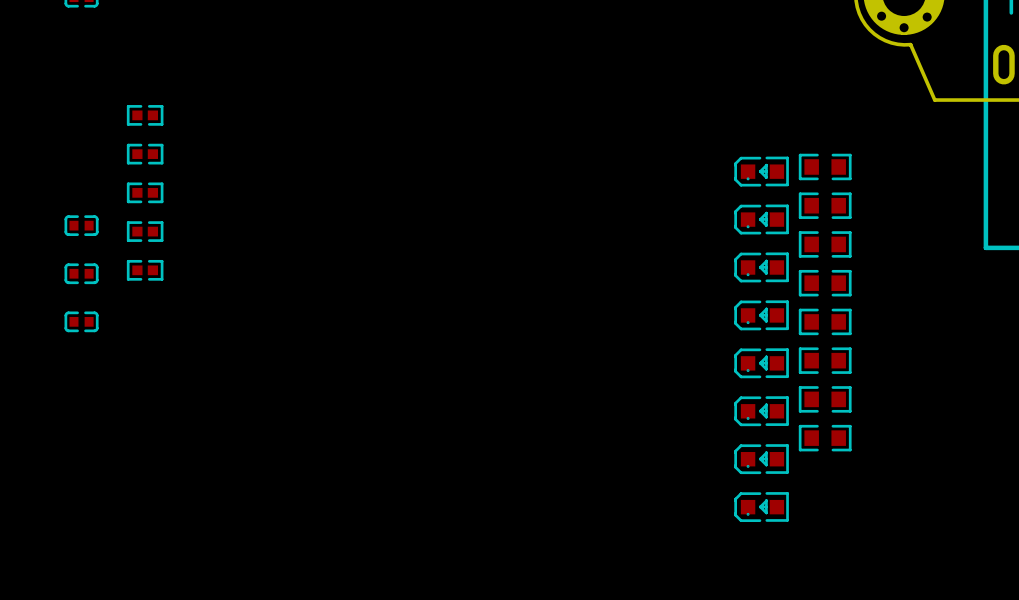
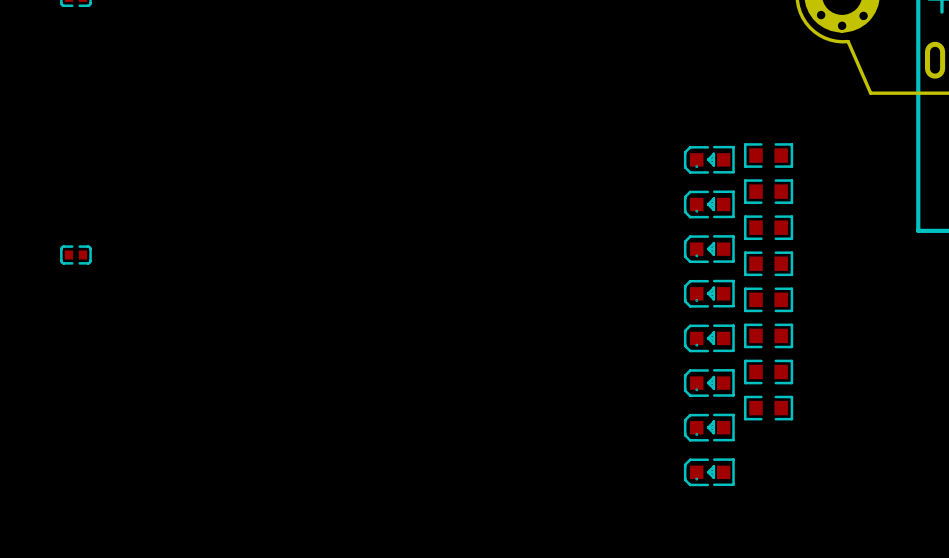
part: (145, 115) -> none
part: (145, 154) -> none
part: (145, 192) -> none
part: (81, 225) -> none
part: (145, 231) -> none
part: (145, 270) -> none
part: (81, 321) -> none

